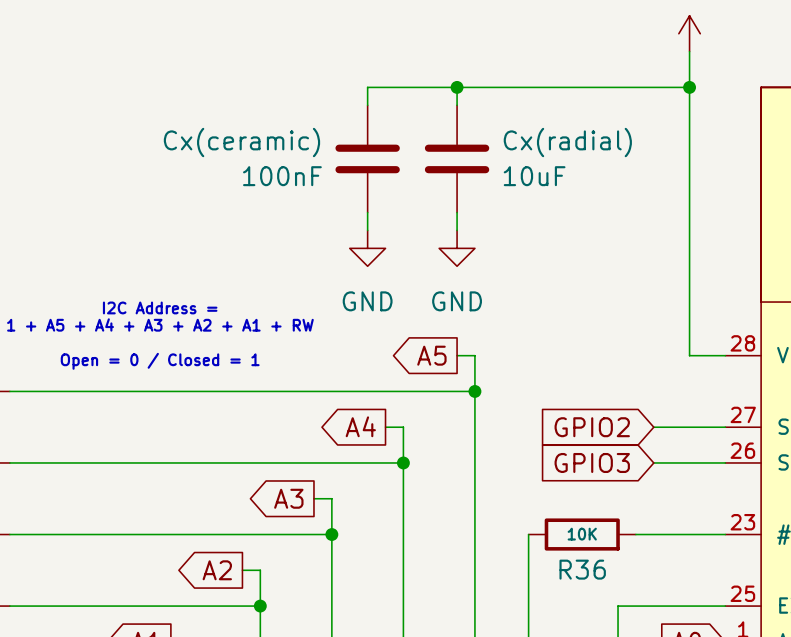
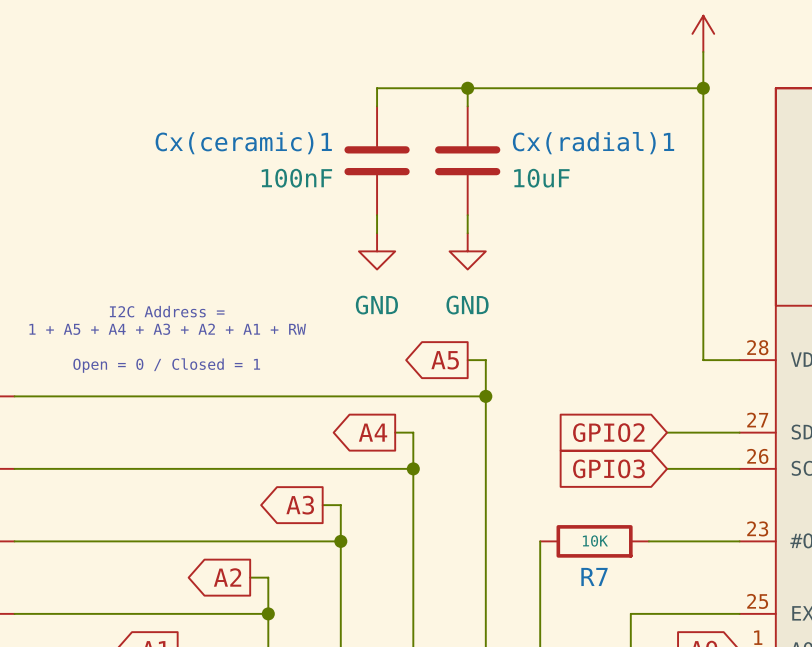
Cx(ceramic) name: Cx(ceramic) (241, 142) -> Cx(ceramic)1 (243, 143)
Cx(radial) name: Cx(radial) (567, 142) -> Cx(radial)1 (593, 143)
R36 name: R36 (582, 569) -> R7 (594, 576)

